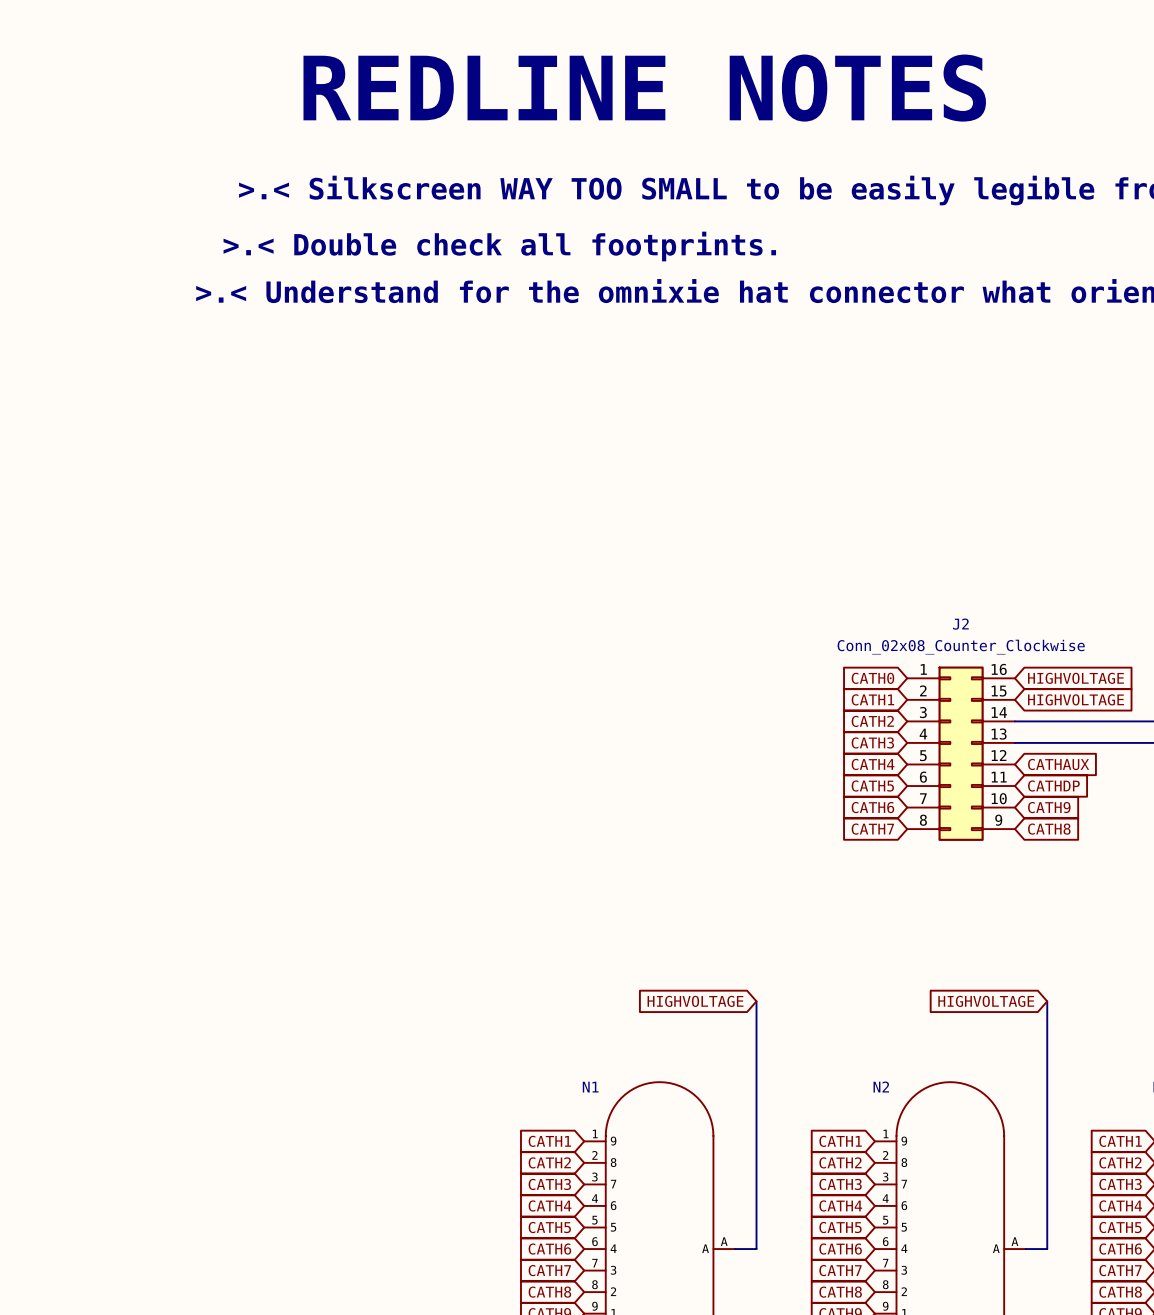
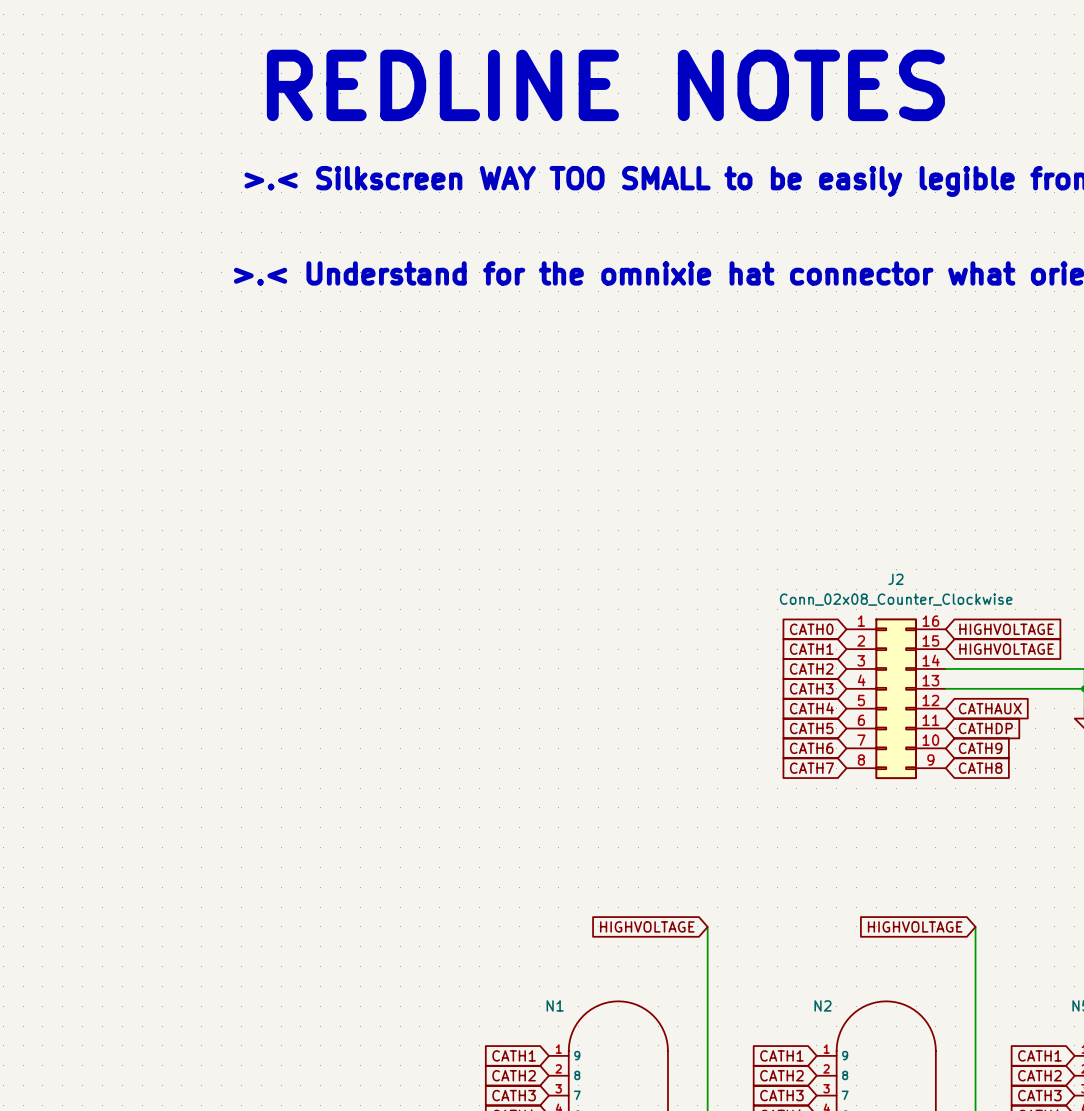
text: >.< Double check all footprints. (499, 246) -> none

